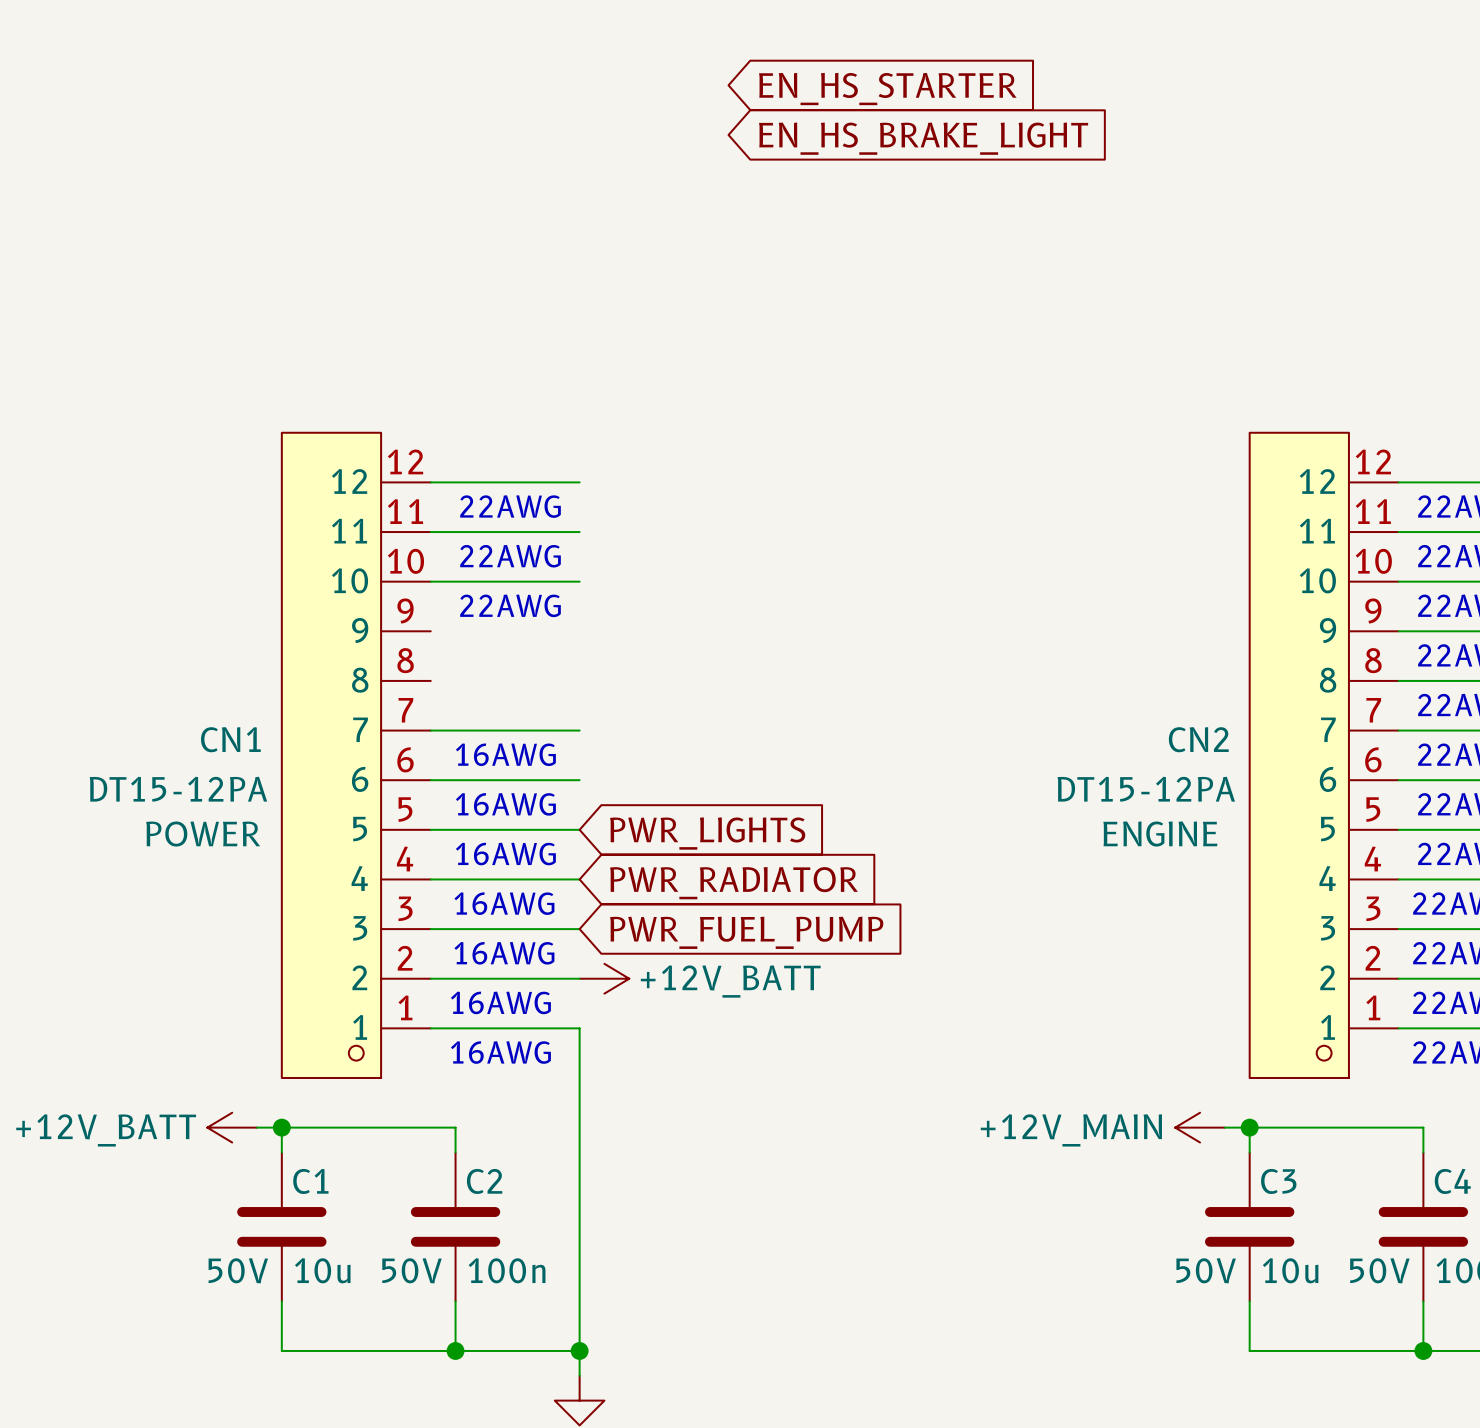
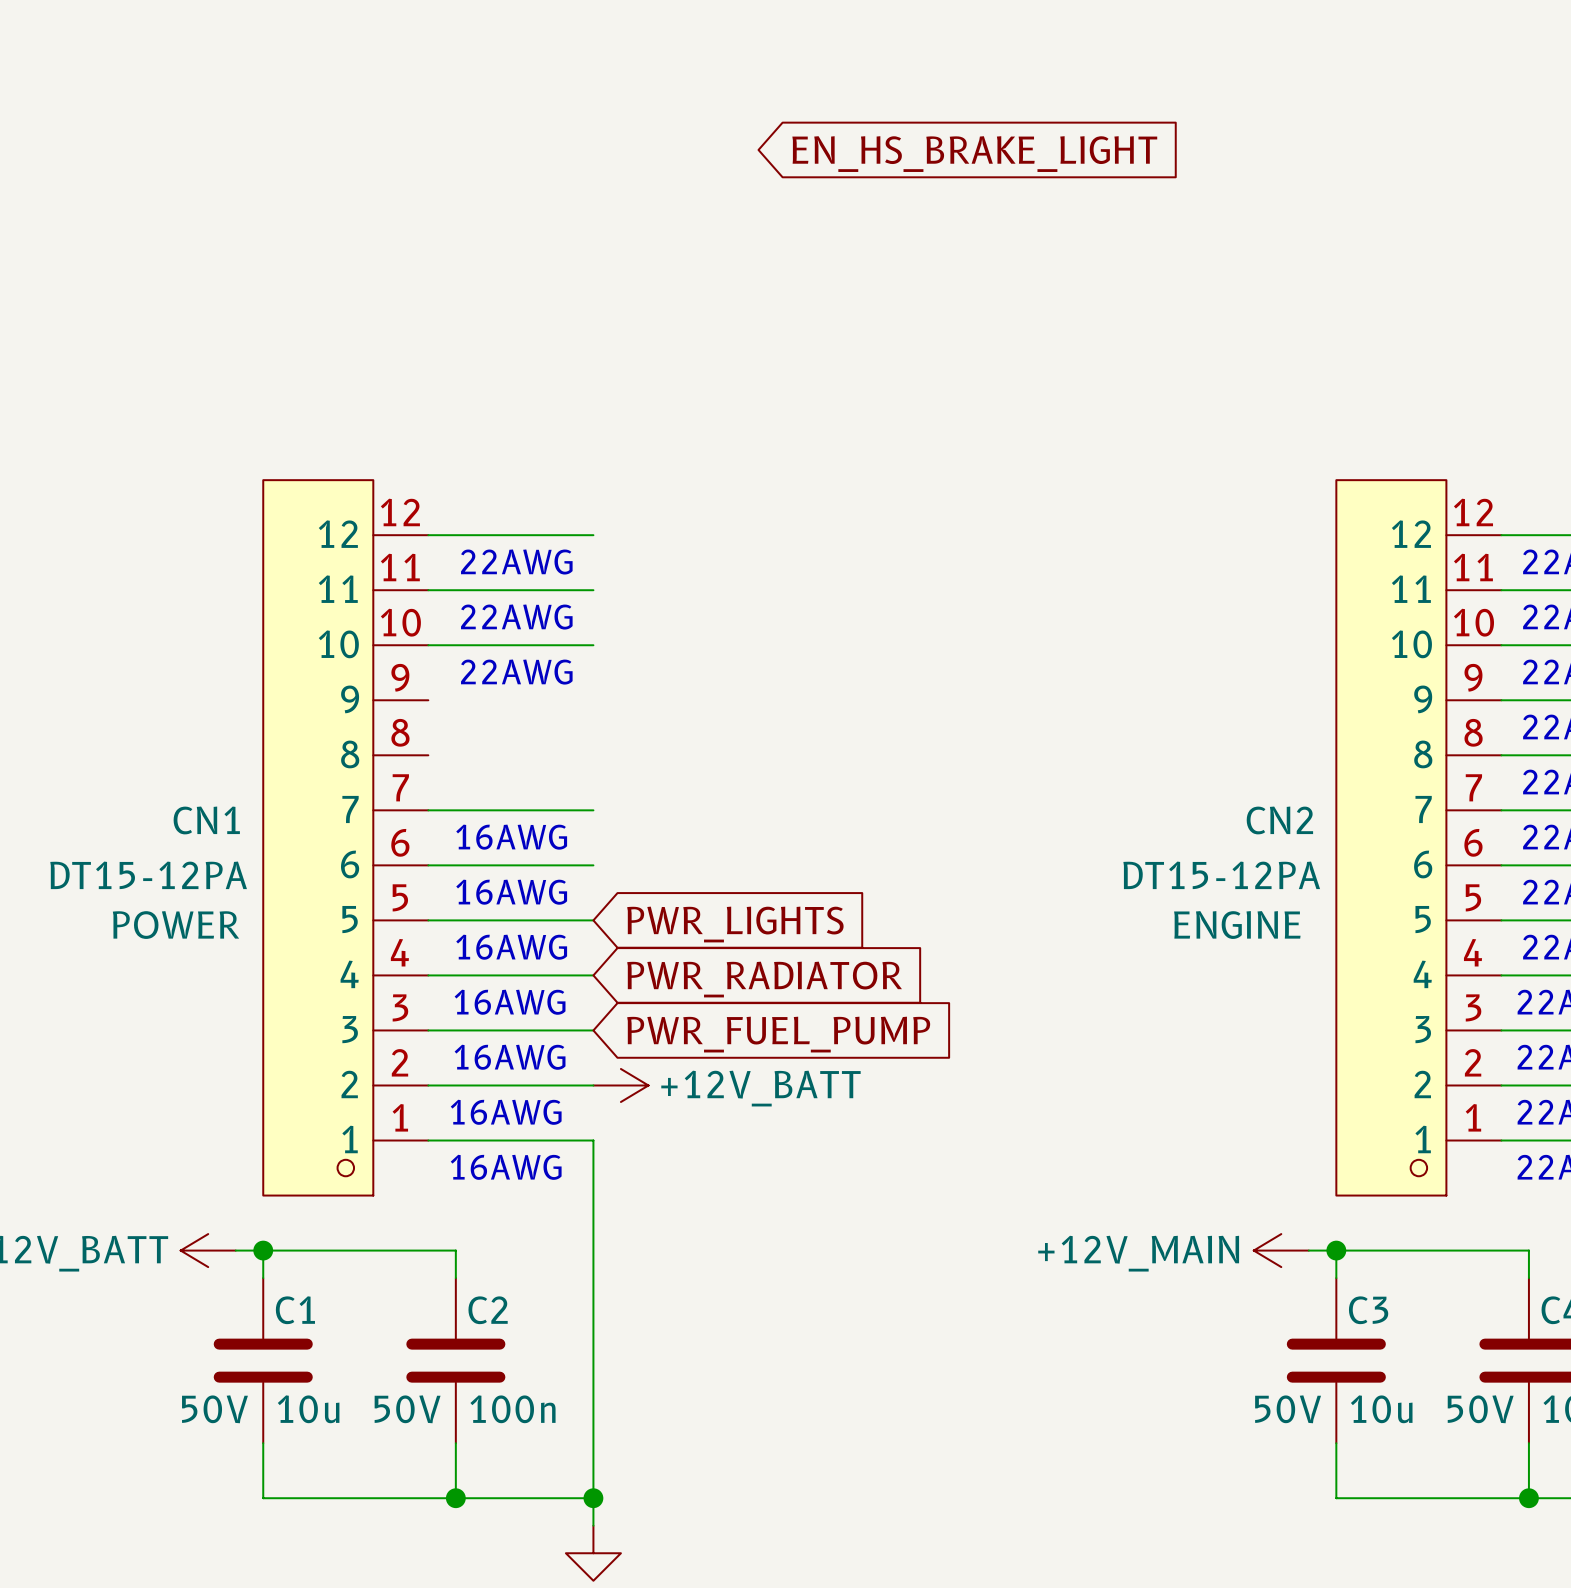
global label: EN_HS_STARTER (887, 89) -> none

